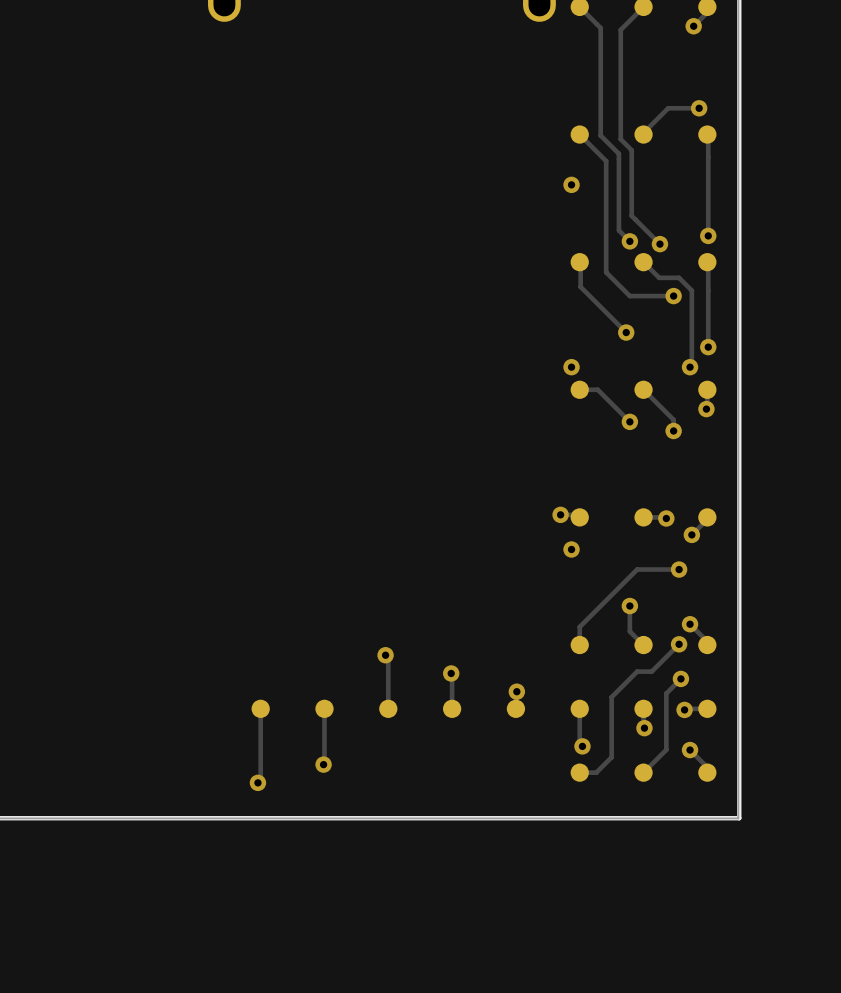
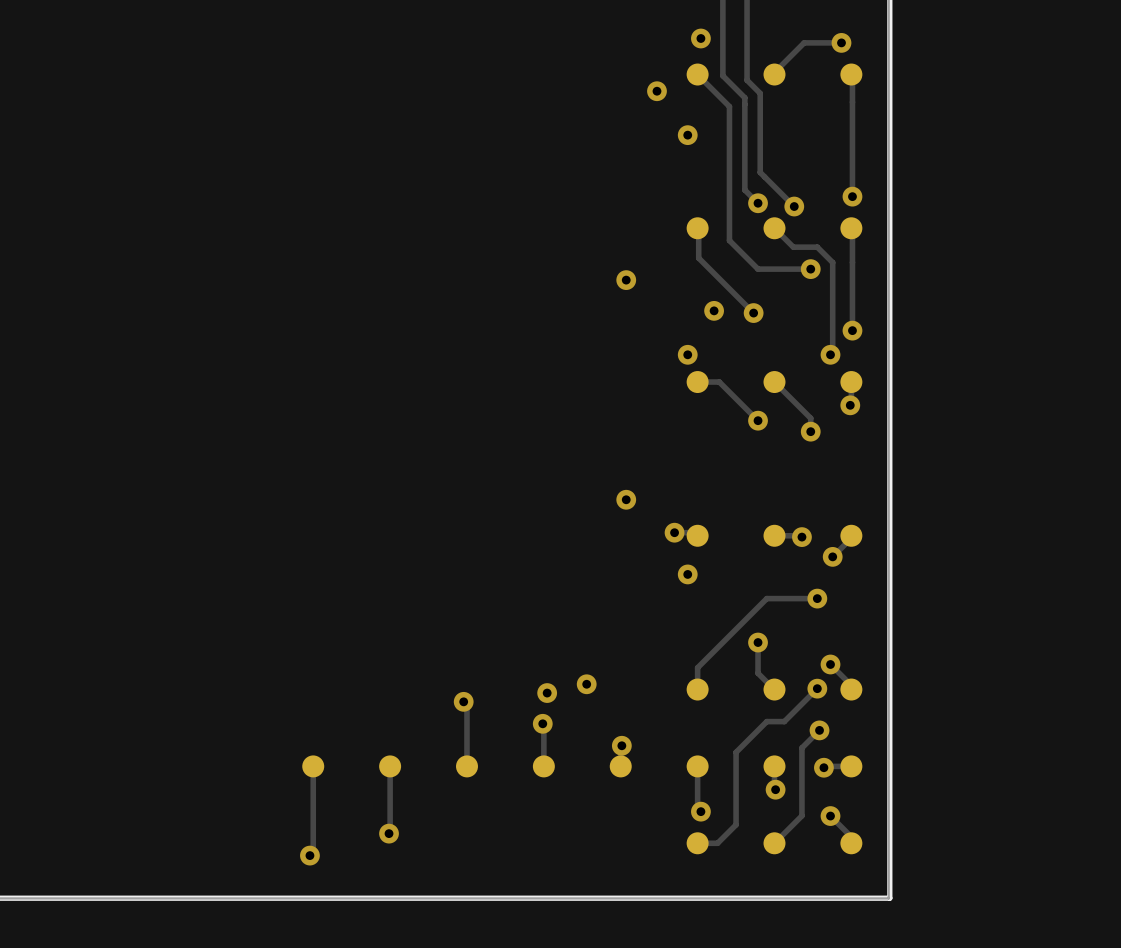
via: none -> (700, 38)
via: none -> (656, 91)
via: none -> (626, 280)
via: none -> (714, 310)
via: none -> (626, 499)
via: none -> (586, 684)
via: none -> (547, 693)

